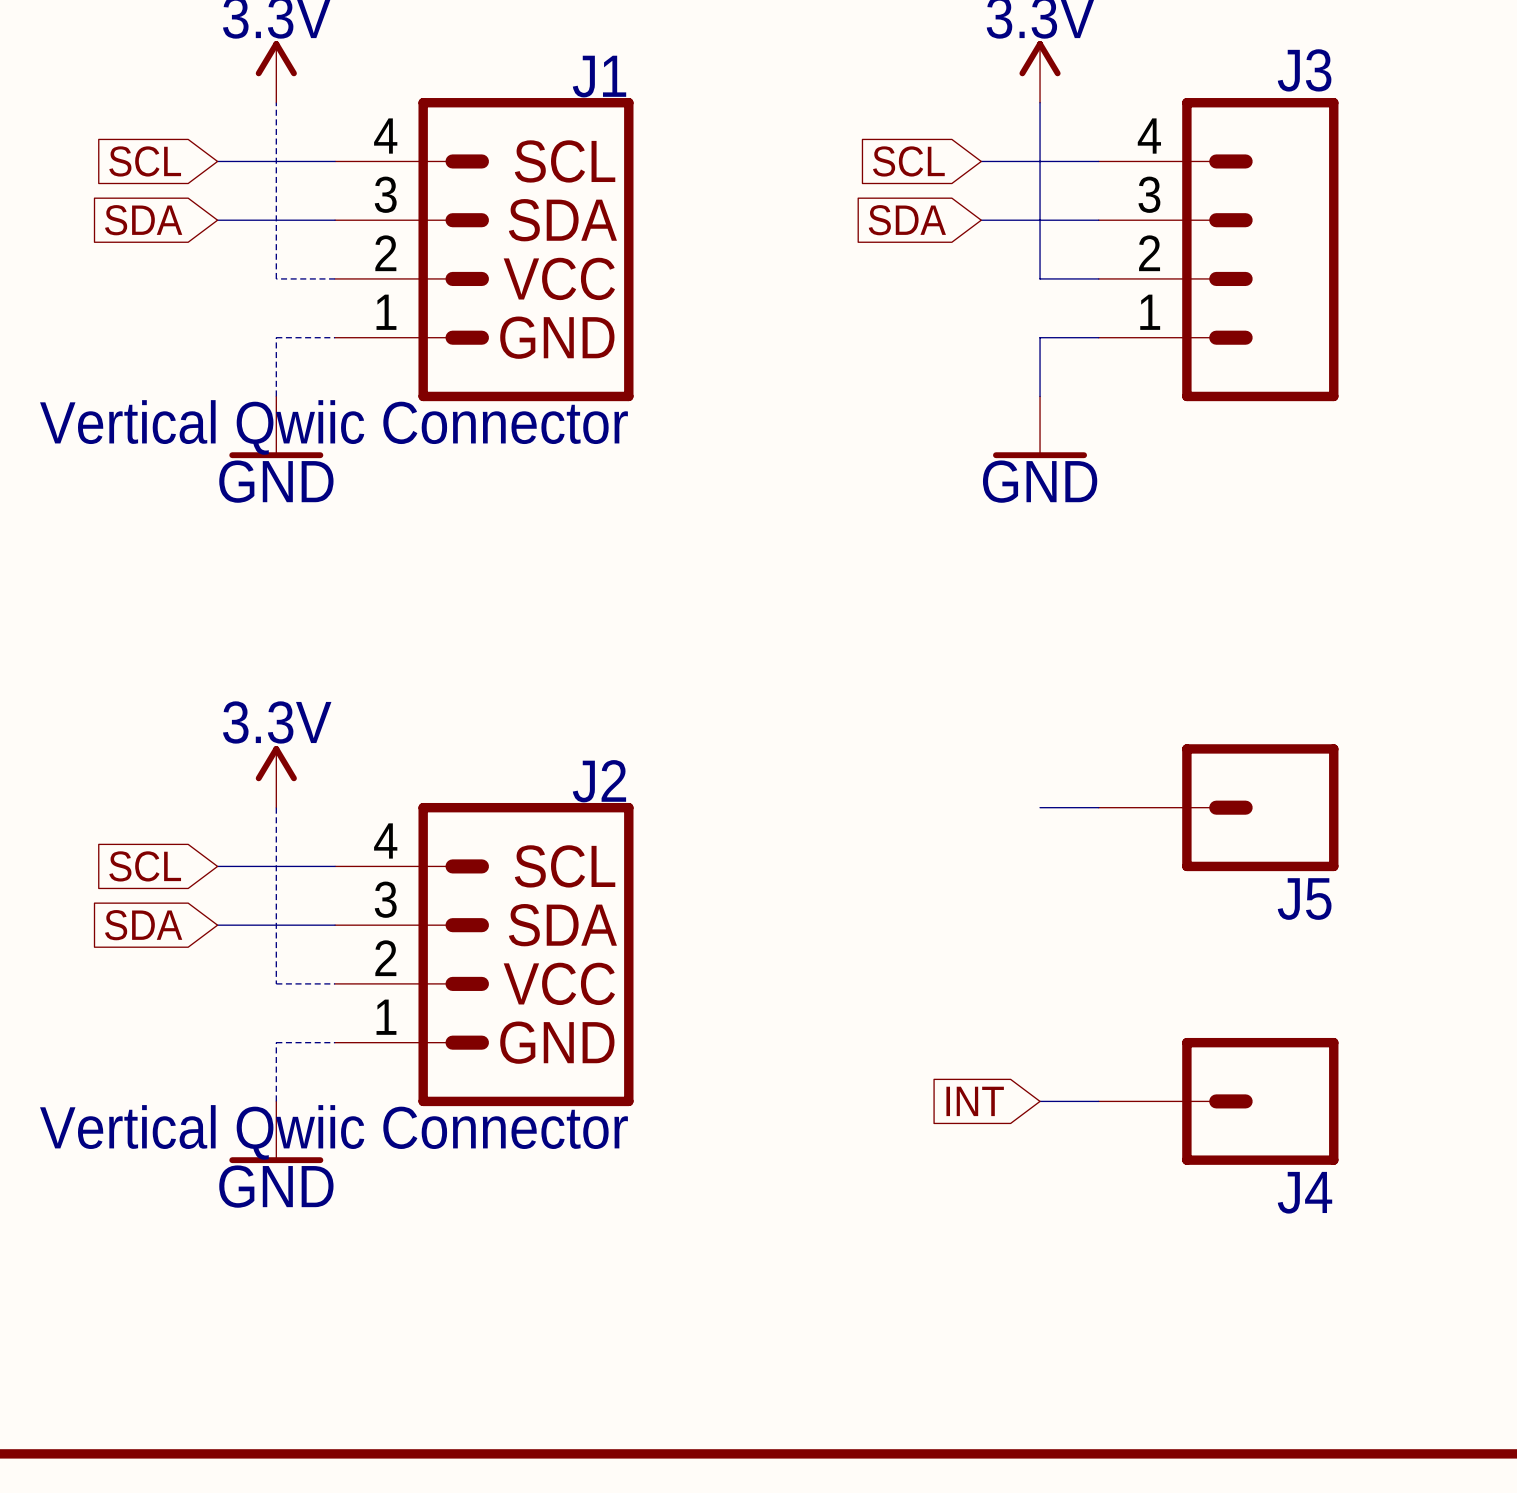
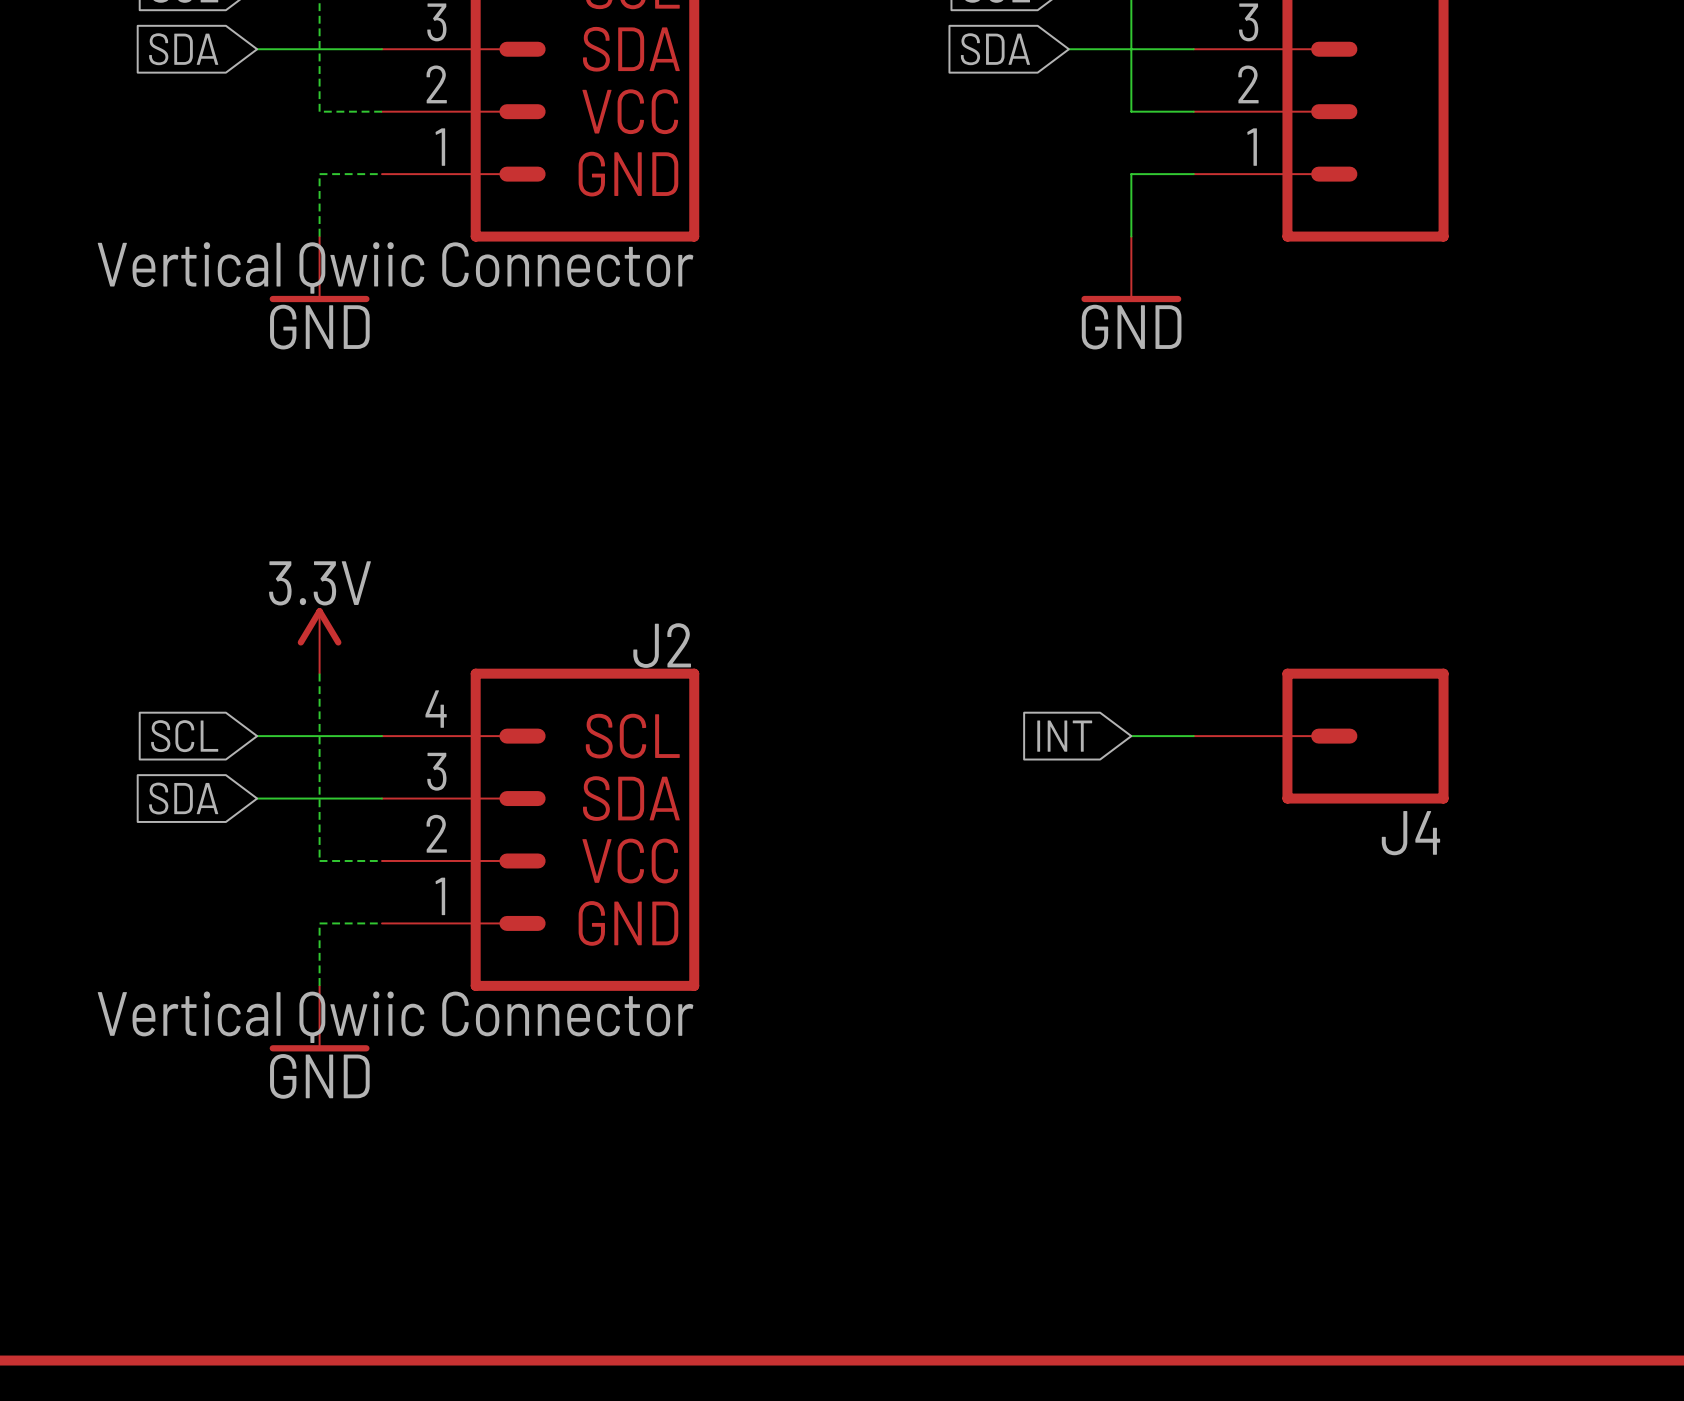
wire: (1040, 807) (1098, 807) -> (1131, 736) (1193, 736)
J5: (1218, 807) -> none
global label position: INT (975, 1101) -> INT (1064, 736)
wire: (1040, 1101) (1098, 1101) -> none
J4 position: (1218, 1101) -> (1321, 736)

